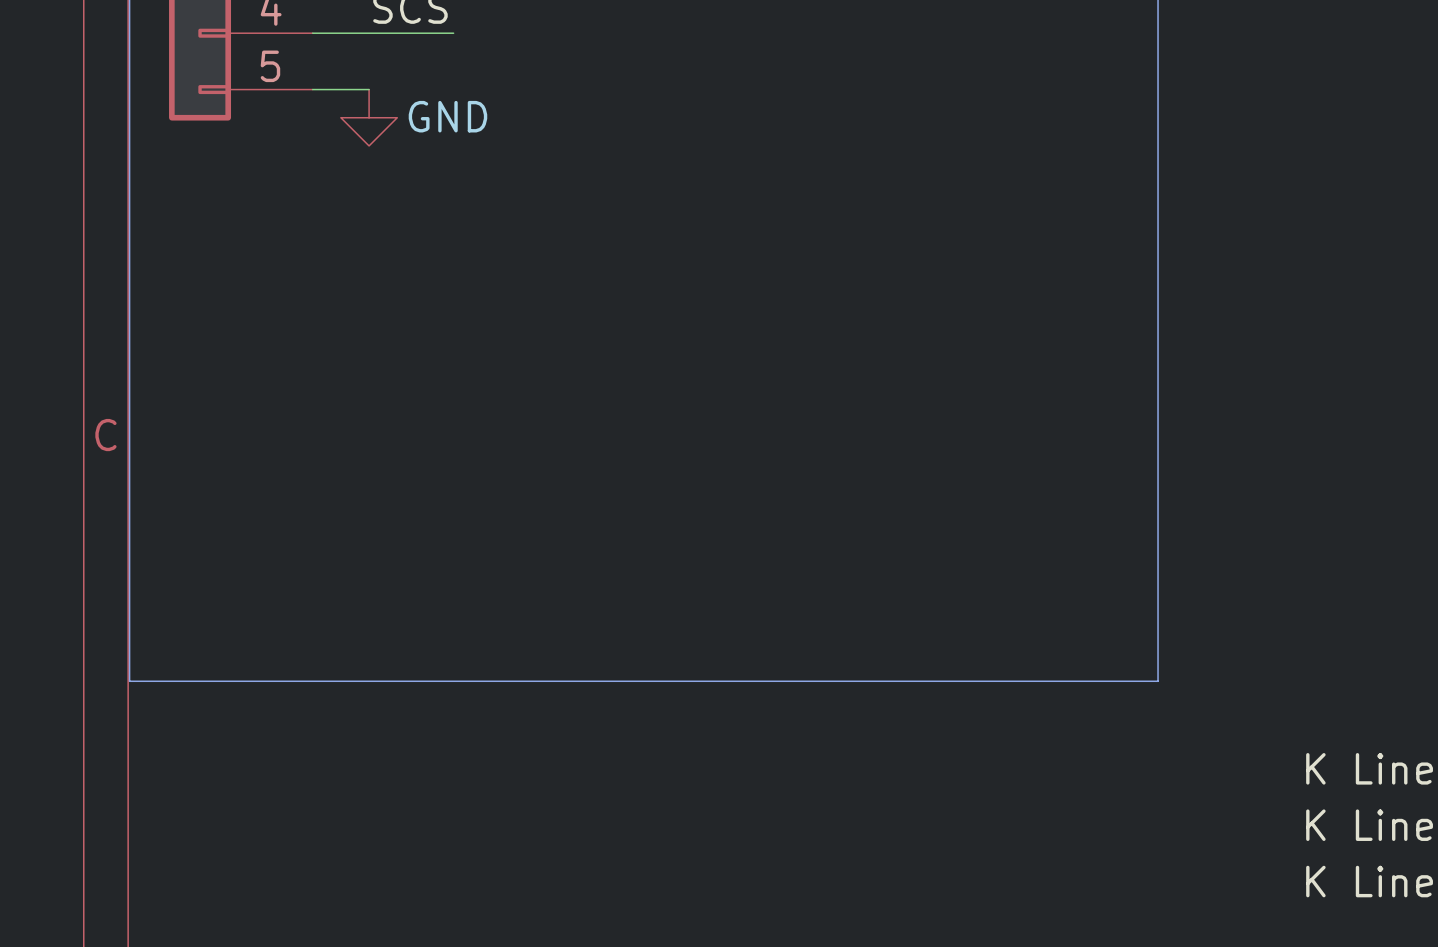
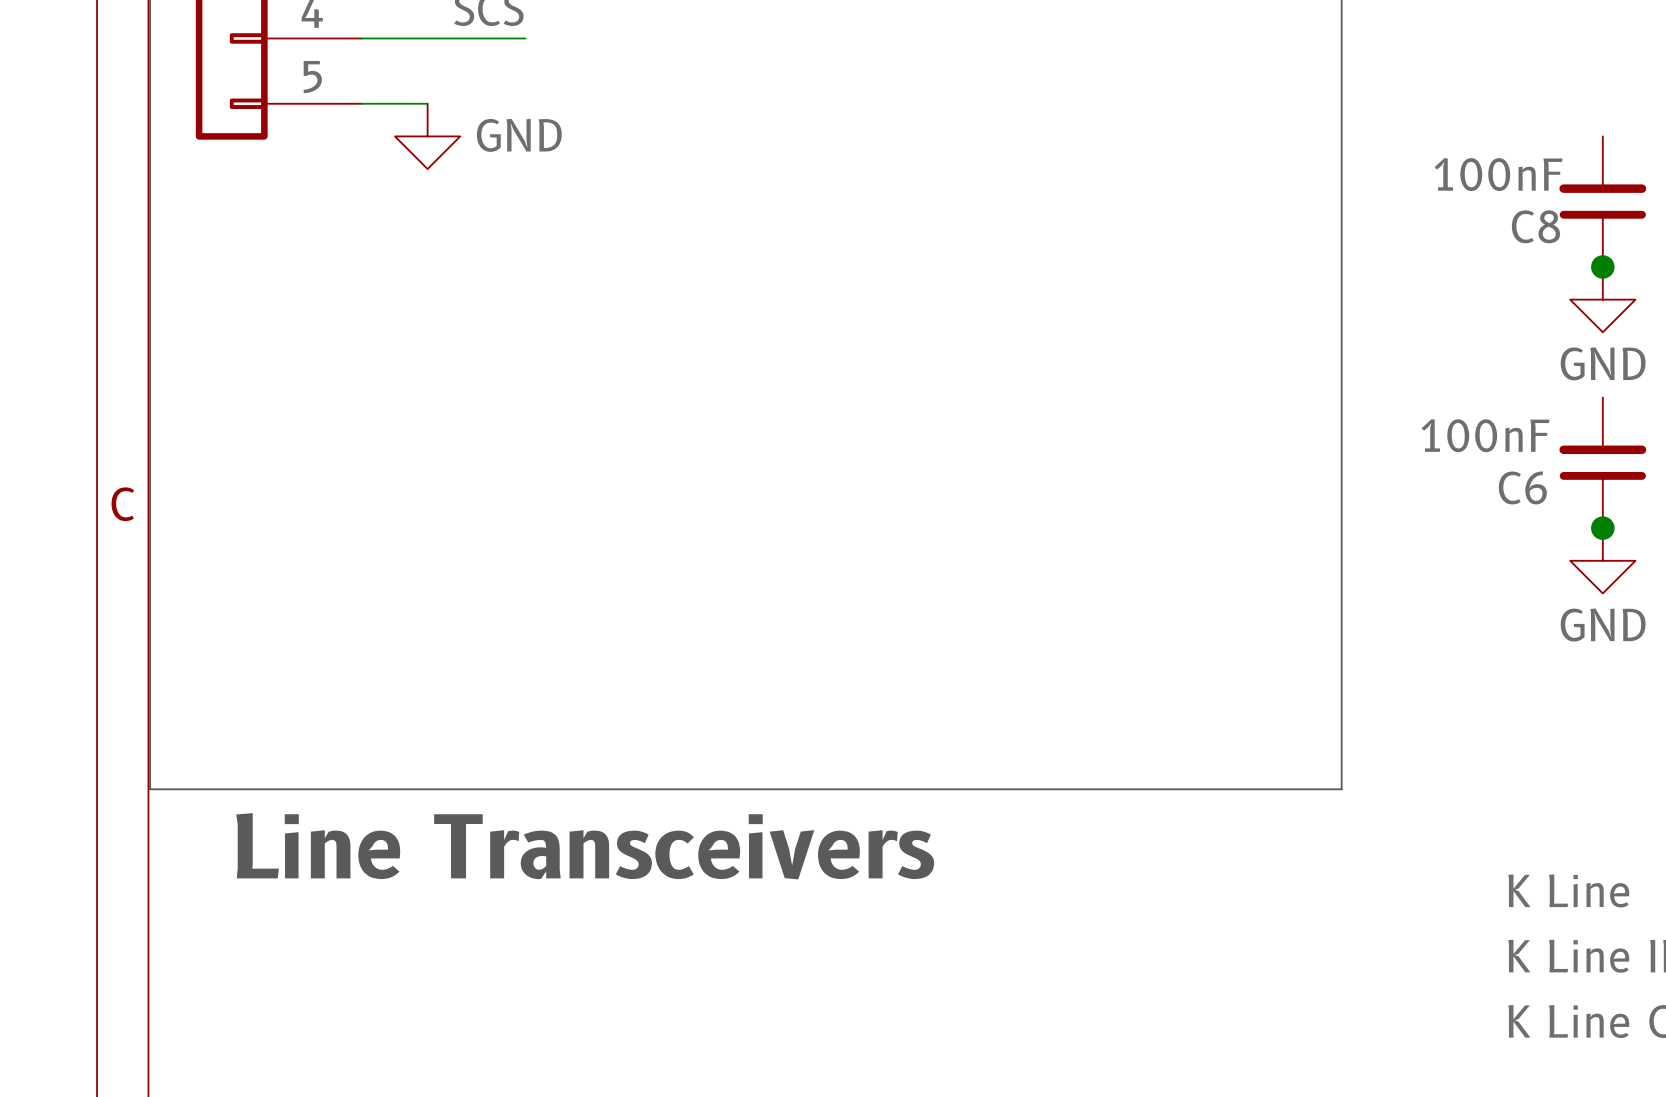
C8: none -> 100nF (1602, 201)
junction: none -> (1602, 266)
power symbol: none -> GND (1602, 299)
C6: none -> 100nF (1602, 462)
junction: none -> (1602, 528)
power symbol: none -> GND (1602, 560)
text: none -> Line Transceivers (585, 846)

